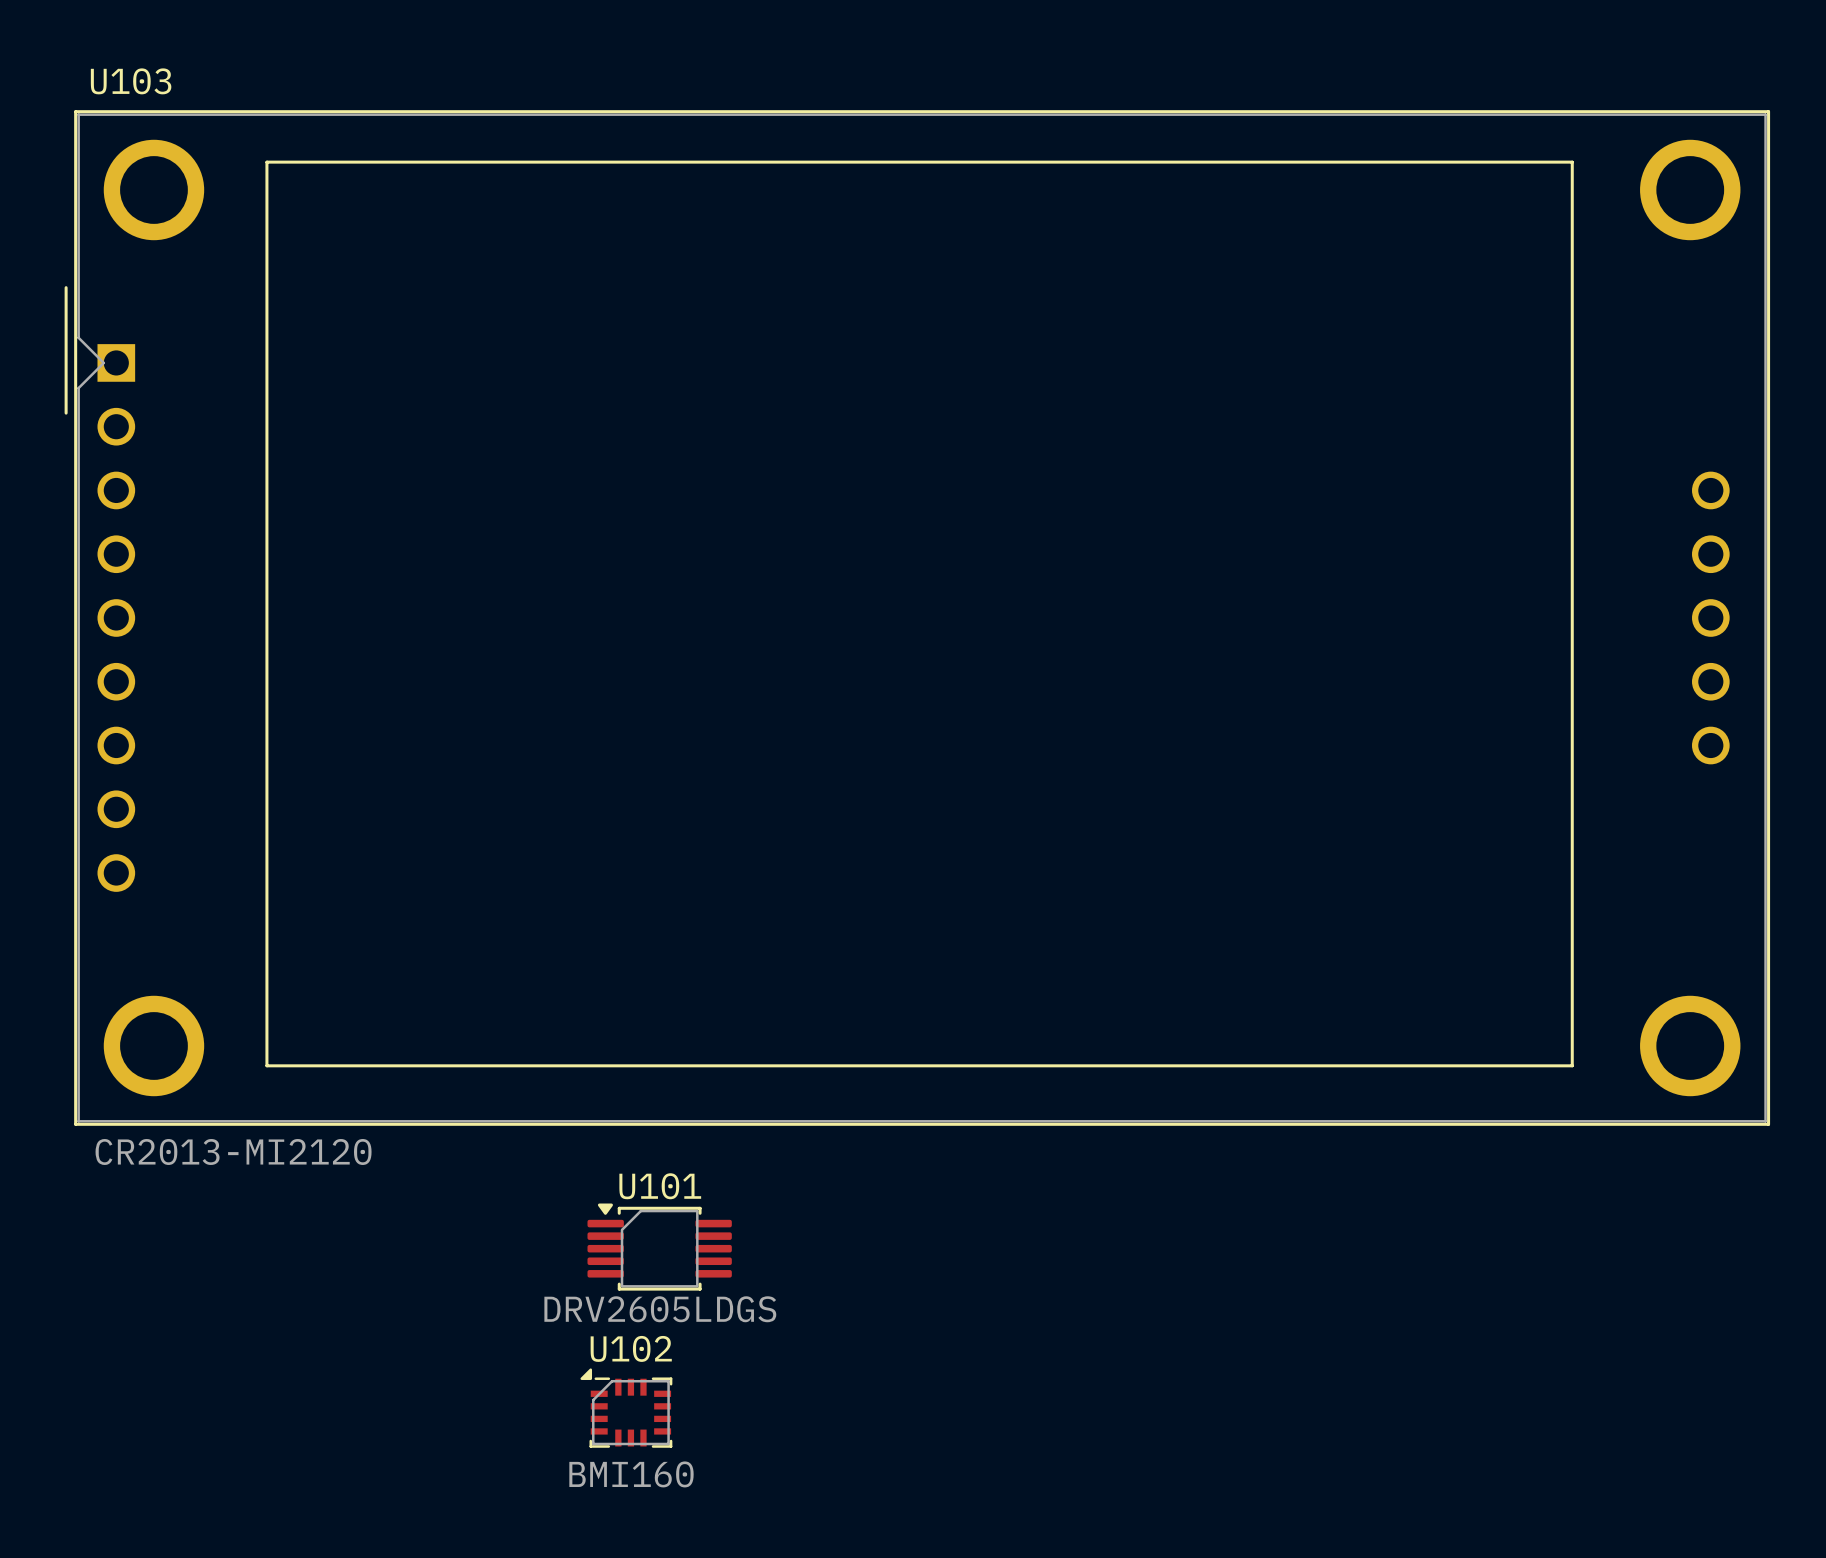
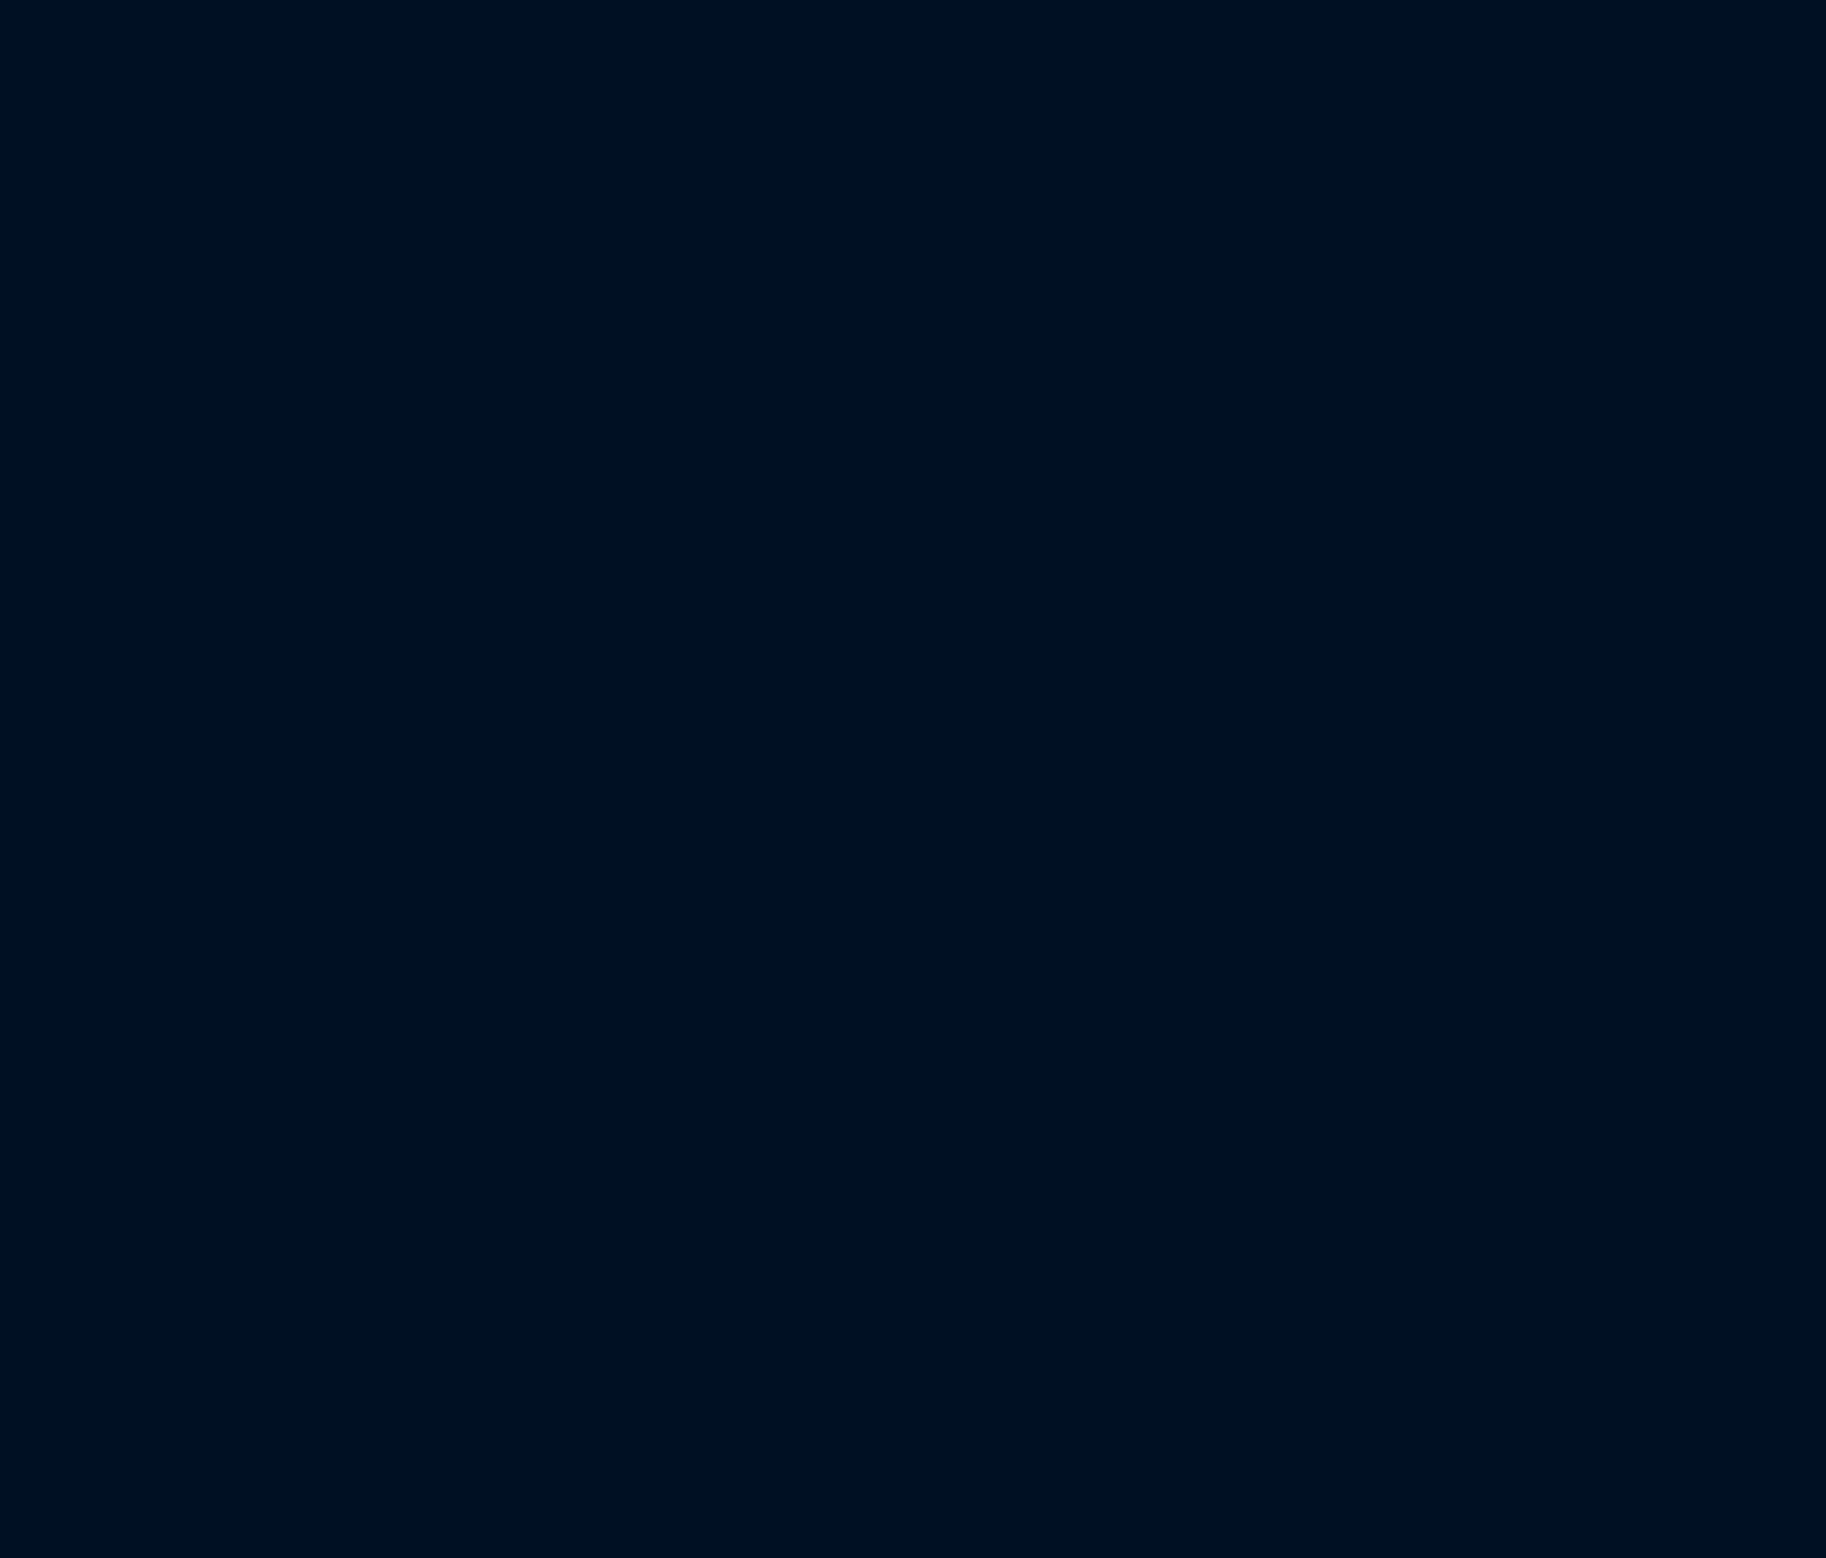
U103: CR2013-MI2120 (917, 617) -> none
U101: DRV2605LDGS (659, 1247) -> none
U102: BMI160 (626, 1408) -> none

